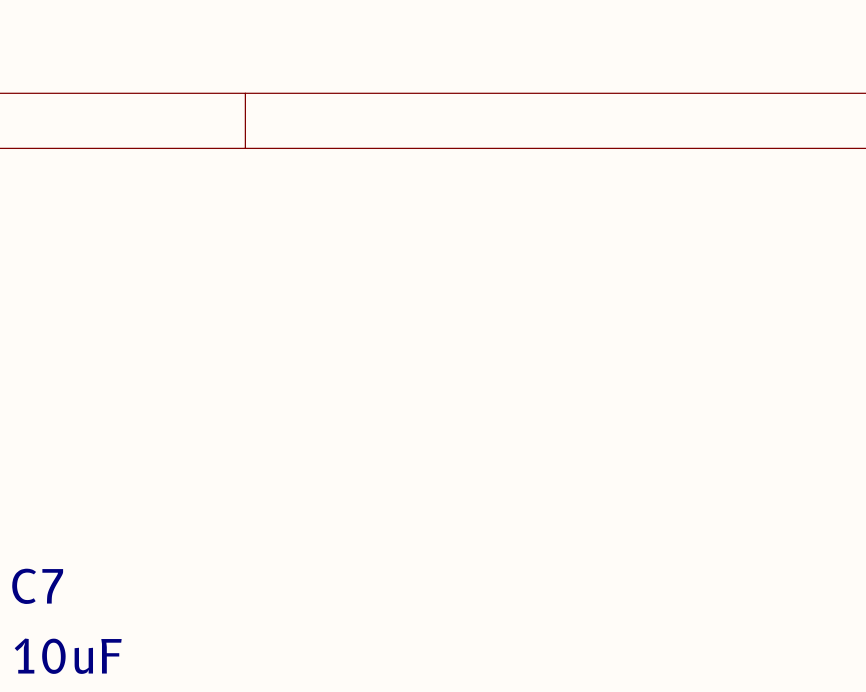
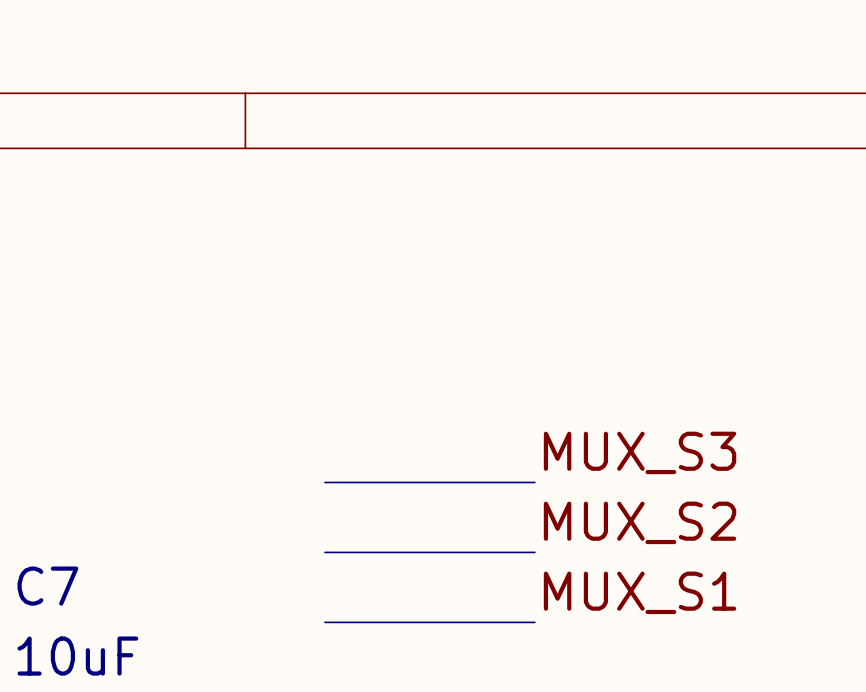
label: none -> MUX_S3 (640, 452)
wire: none -> (324, 482) (534, 482)
label: none -> MUX_S2 (640, 522)
wire: none -> (324, 552) (534, 552)
label: none -> MUX_S1 (640, 592)
wire: none -> (324, 622) (534, 622)

